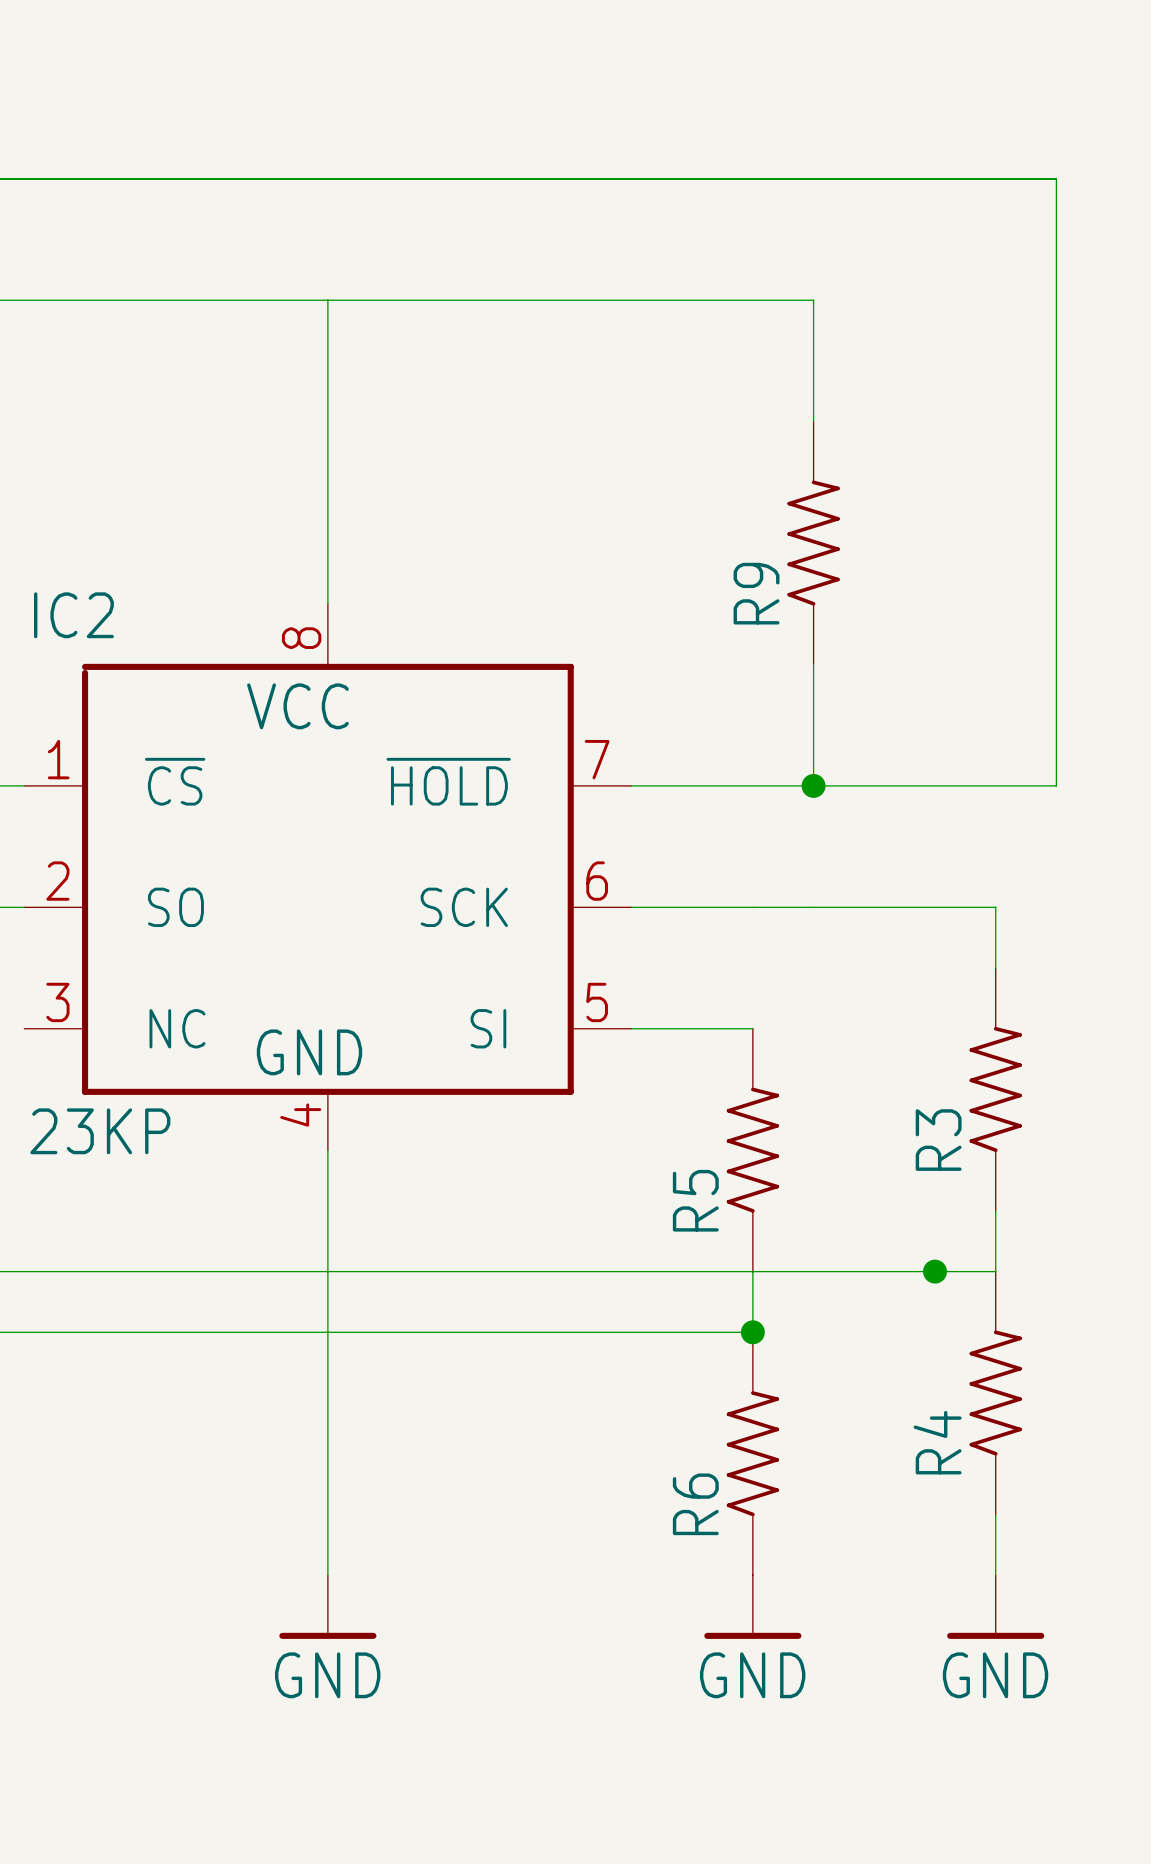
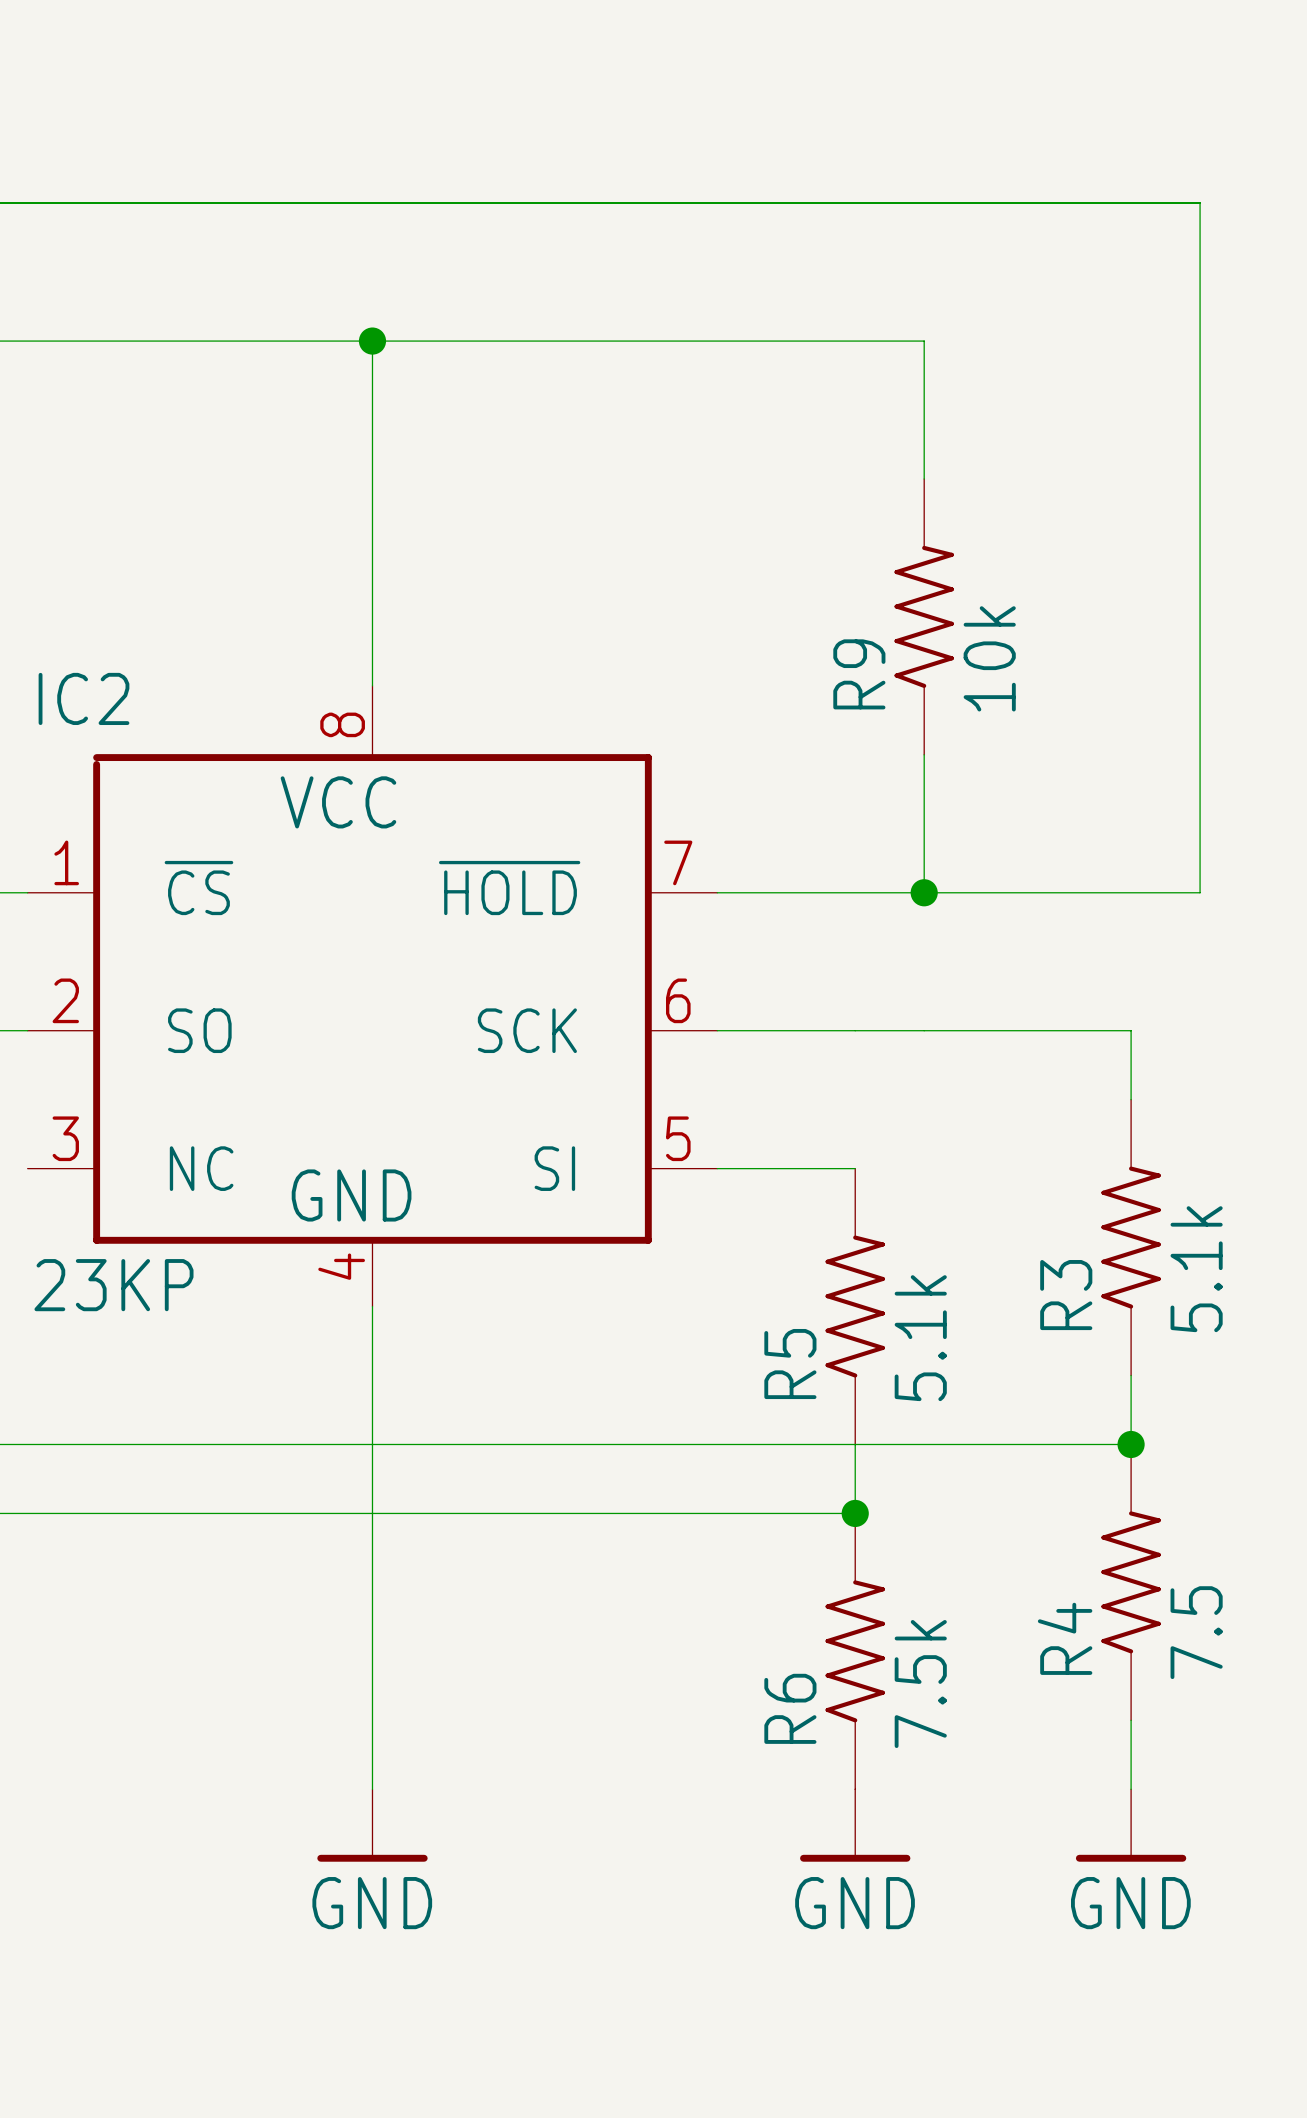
junction: none -> (372, 341)
R9 value: none -> 10k (989, 658)
R3 value: none -> 5.1k (1196, 1269)
R5 value: none -> 5.1k (920, 1338)
junction position: (935, 1271) -> (1131, 1444)
R4 value: none -> 7.5 (1196, 1632)
R6 value: none -> 7.5k (920, 1684)

